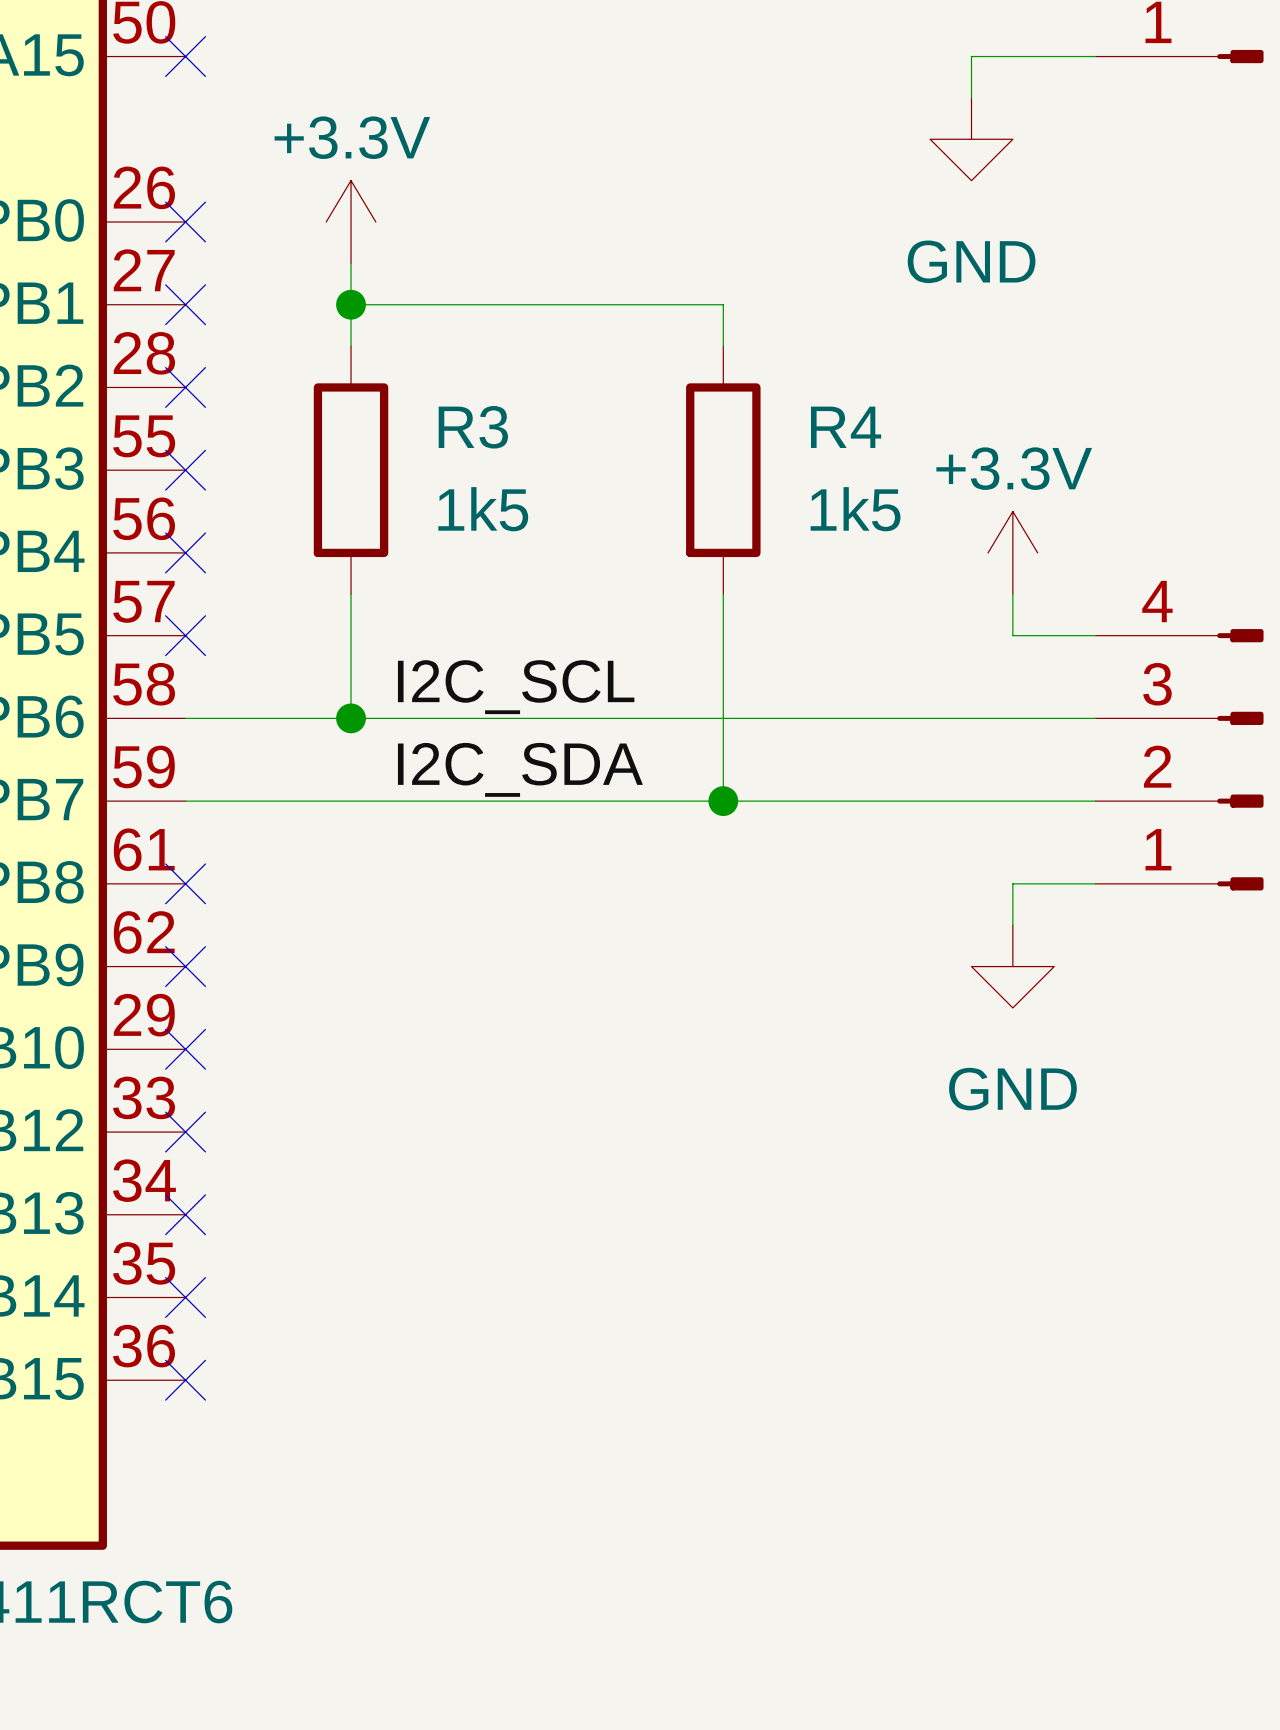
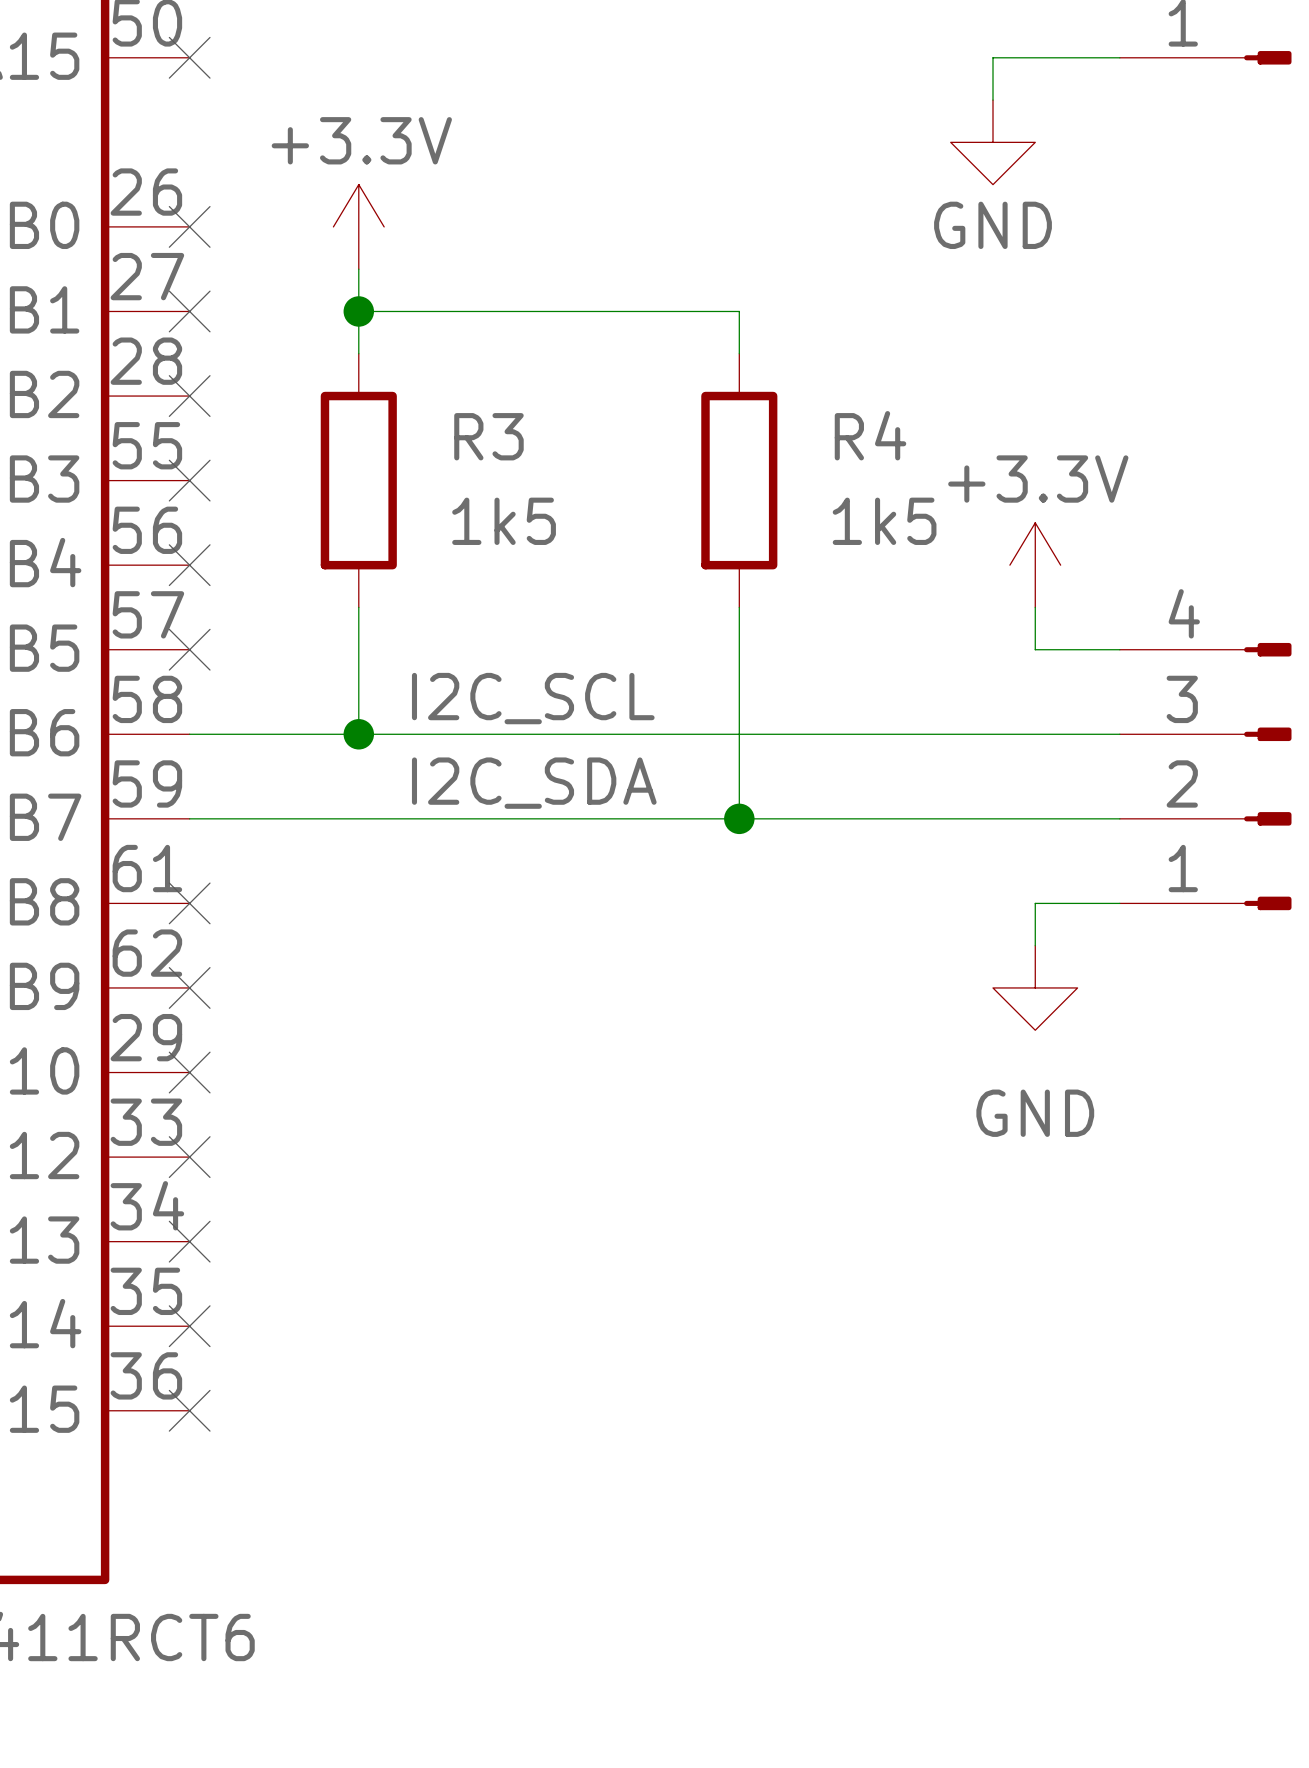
power symbol text position: GND (971, 261) -> GND (993, 225)

